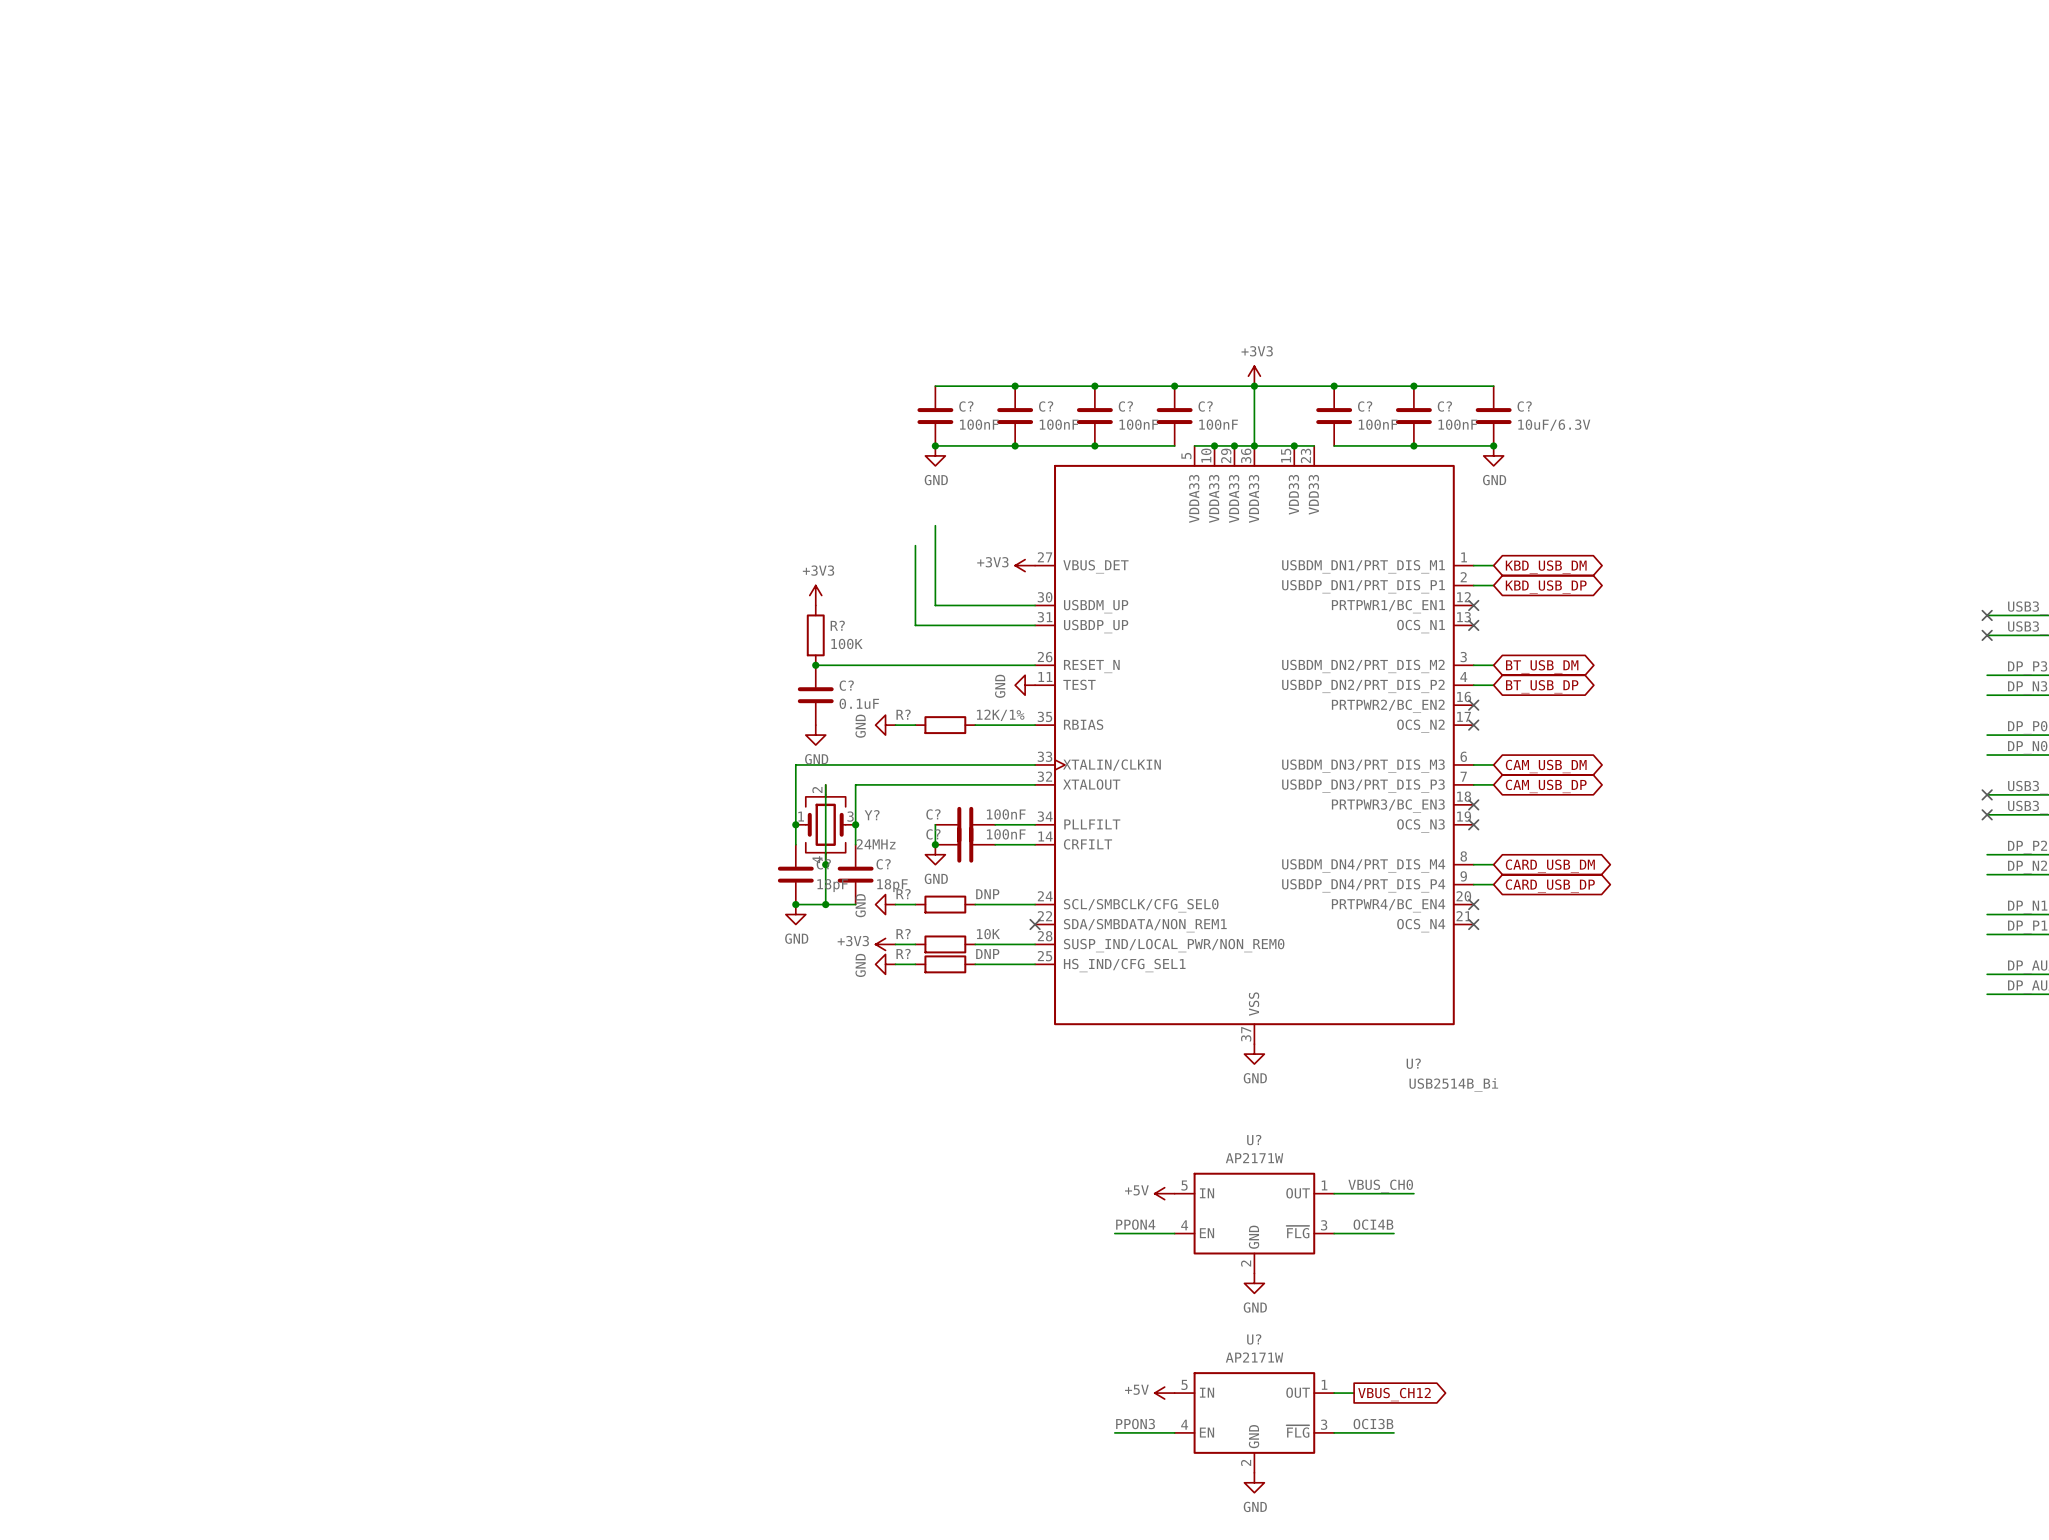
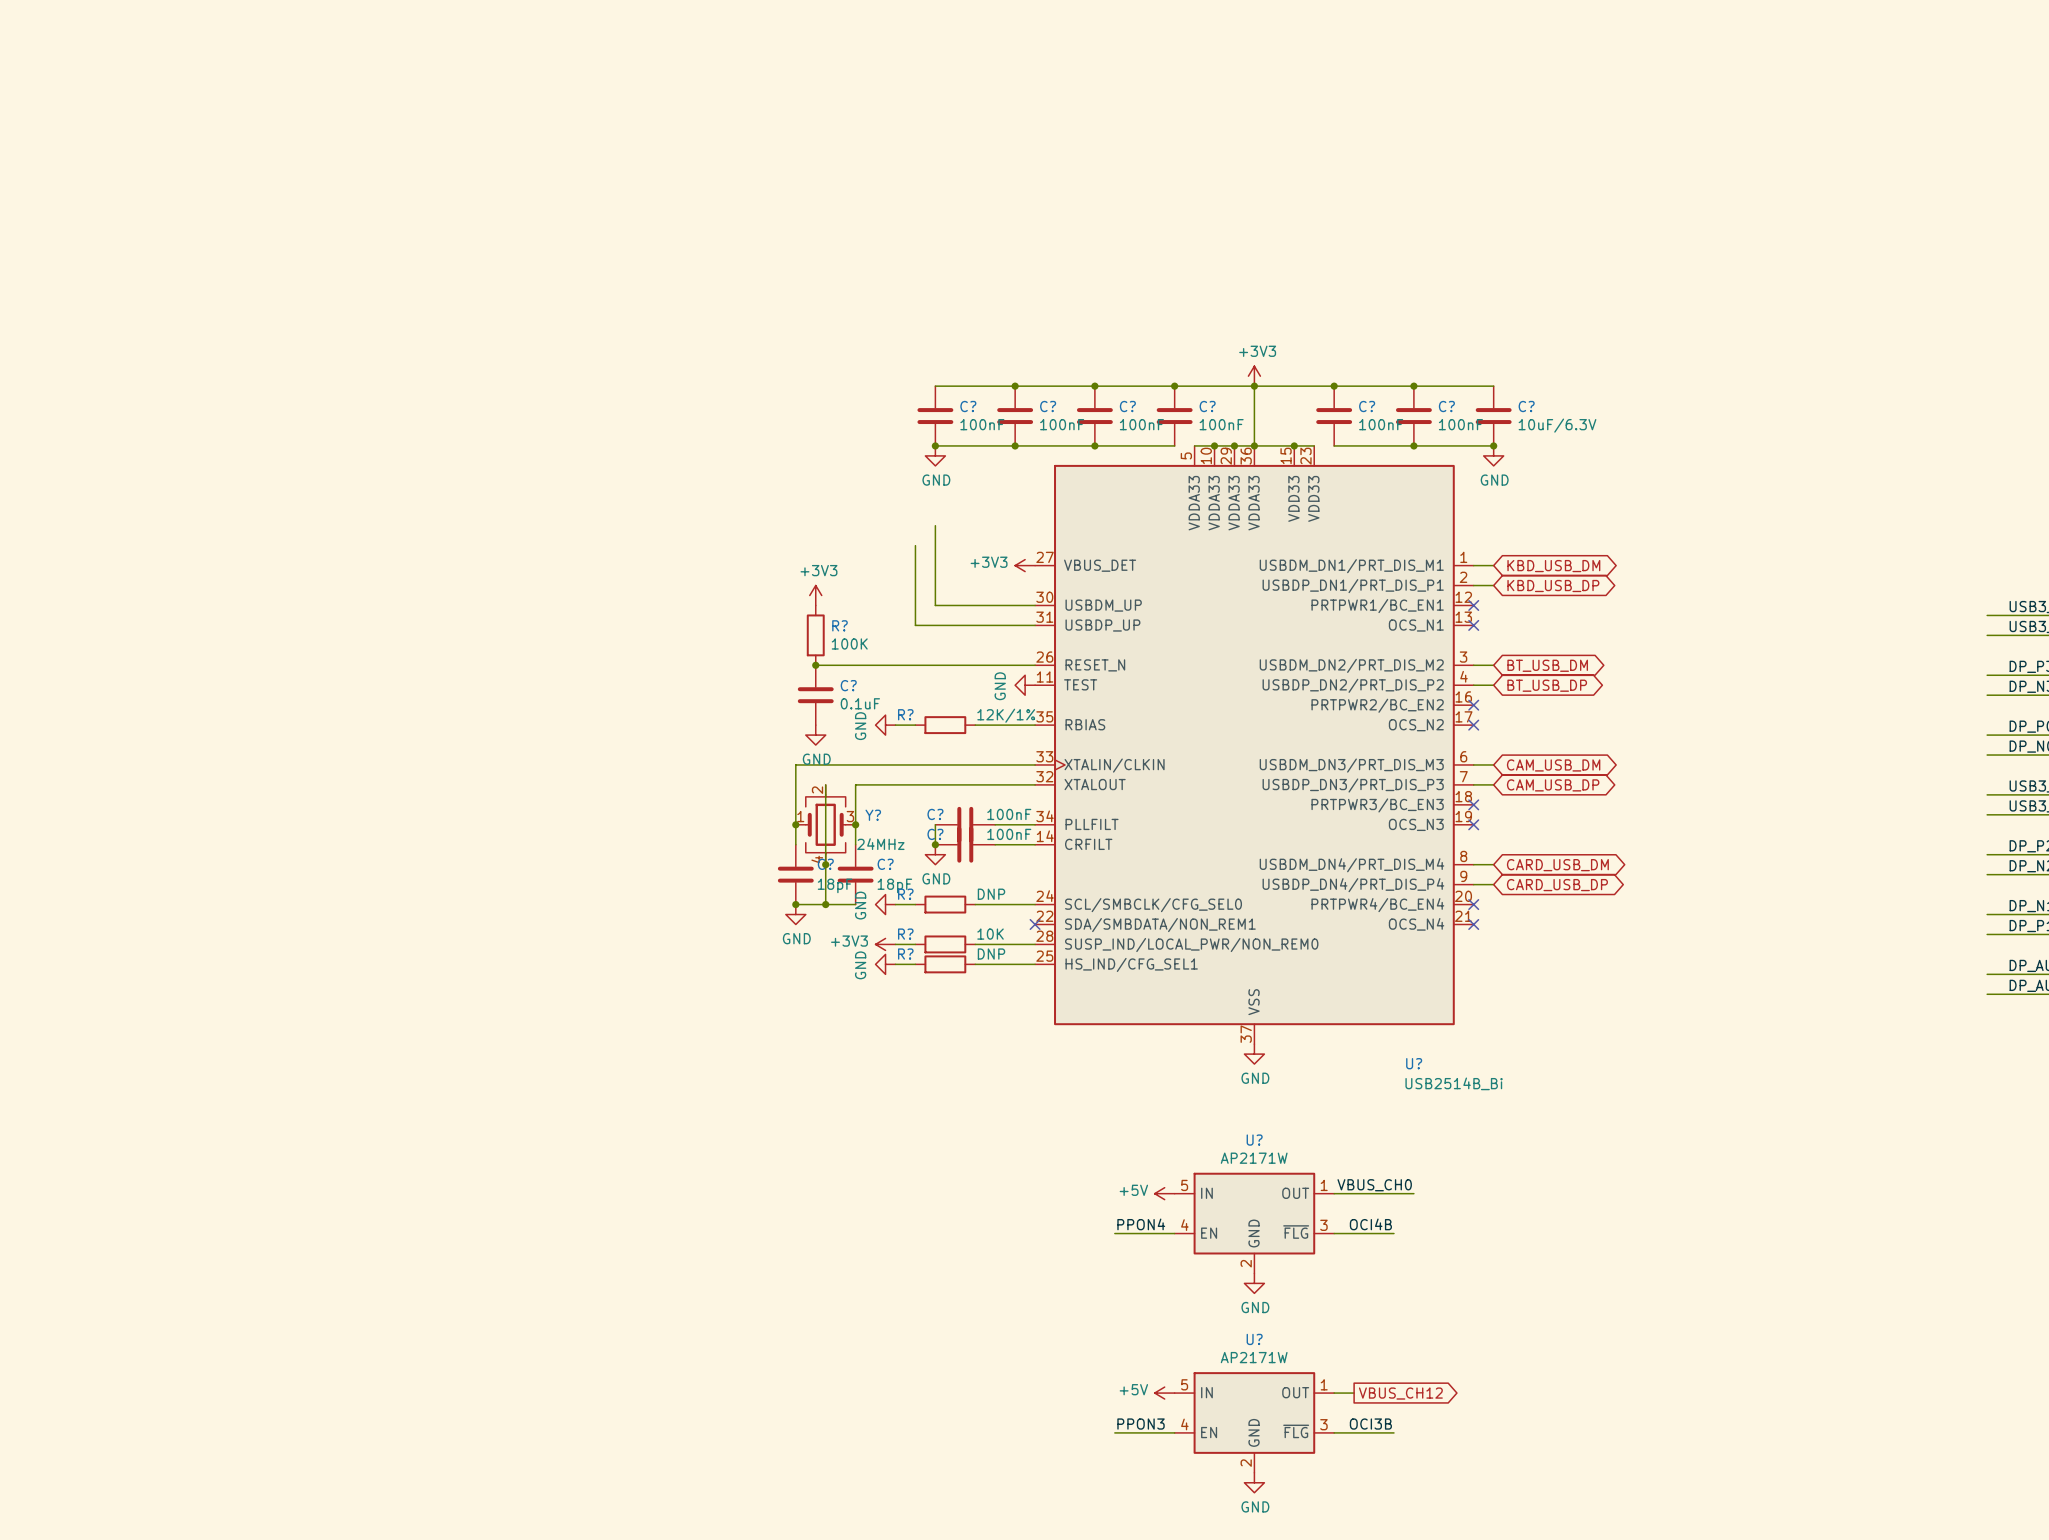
no-connect mark: (1987, 615) -> none
no-connect mark: (1987, 635) -> none
no-connect mark: (1987, 794) -> none
no-connect mark: (1987, 814) -> none

